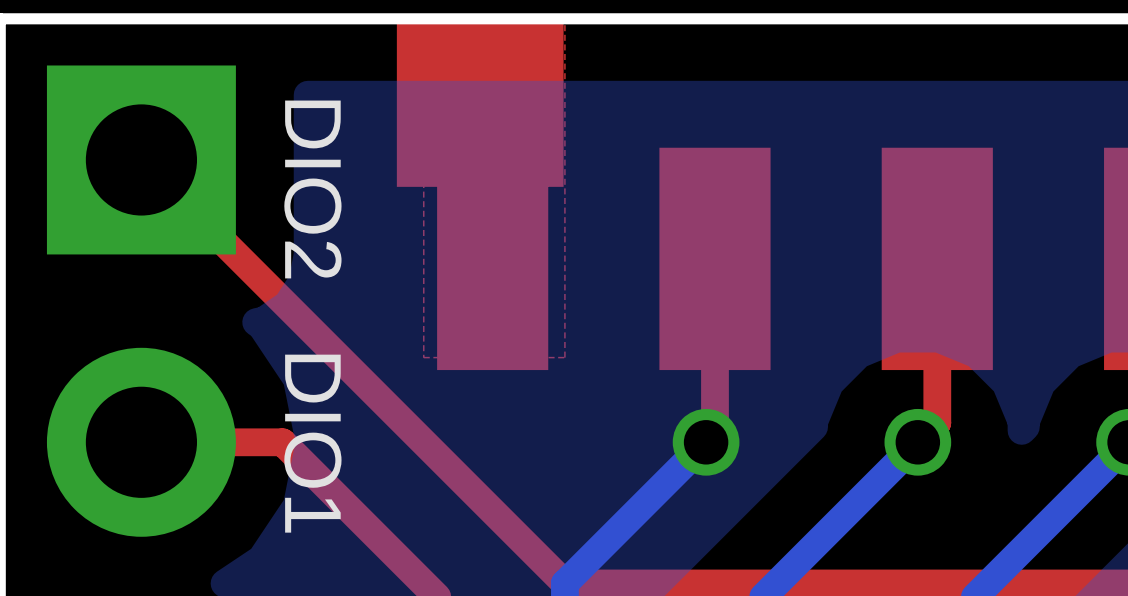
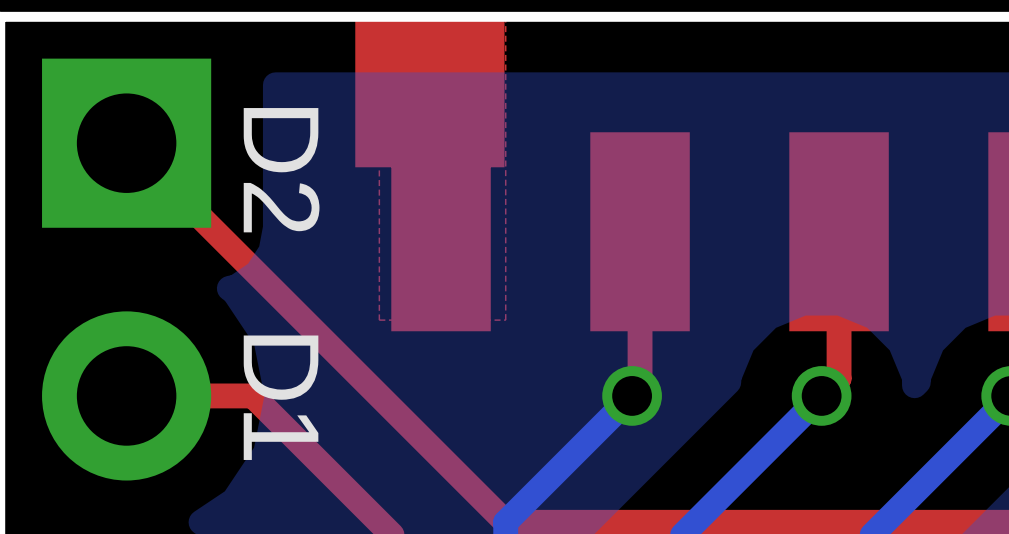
text: DIO2 (312, 189) -> D2 (281, 170)
text: DIO1 (312, 443) -> D1 (281, 397)

